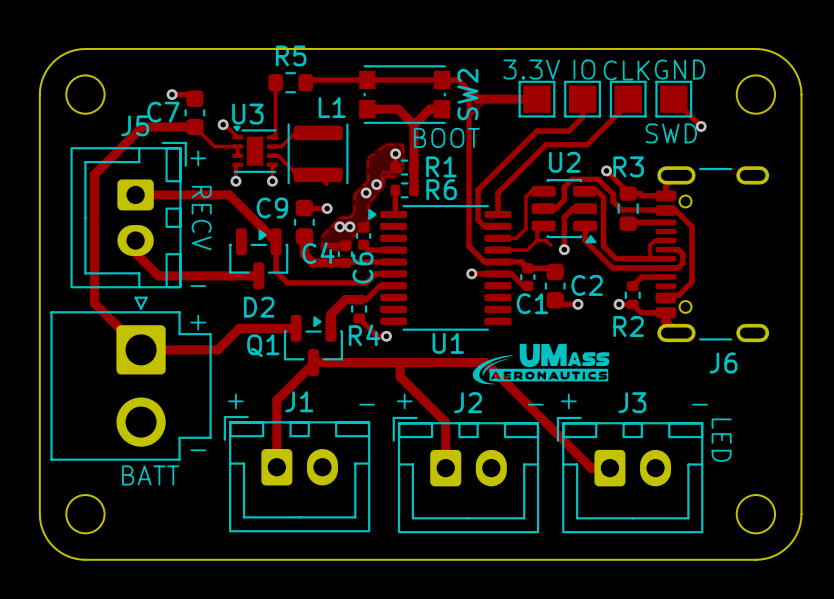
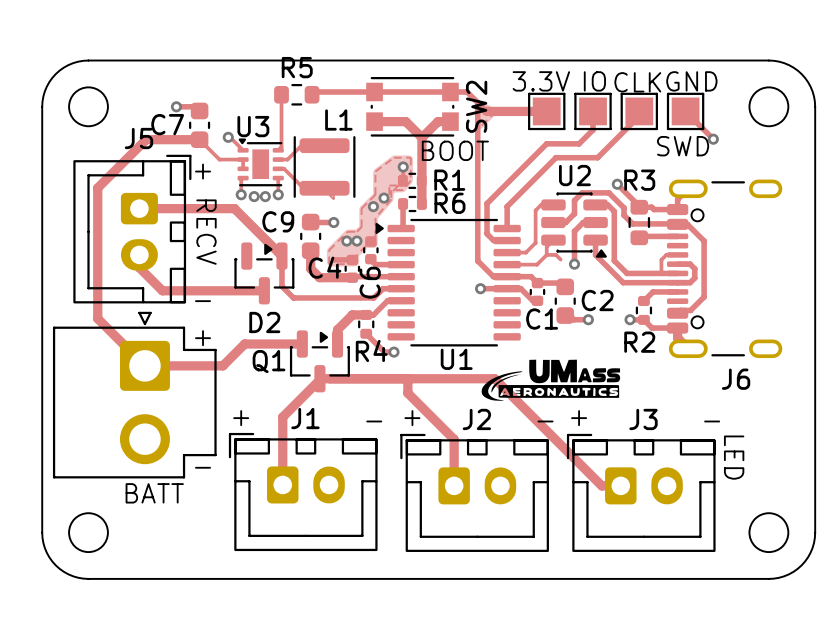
via: none -> (254, 196)
via: none -> (265, 196)

